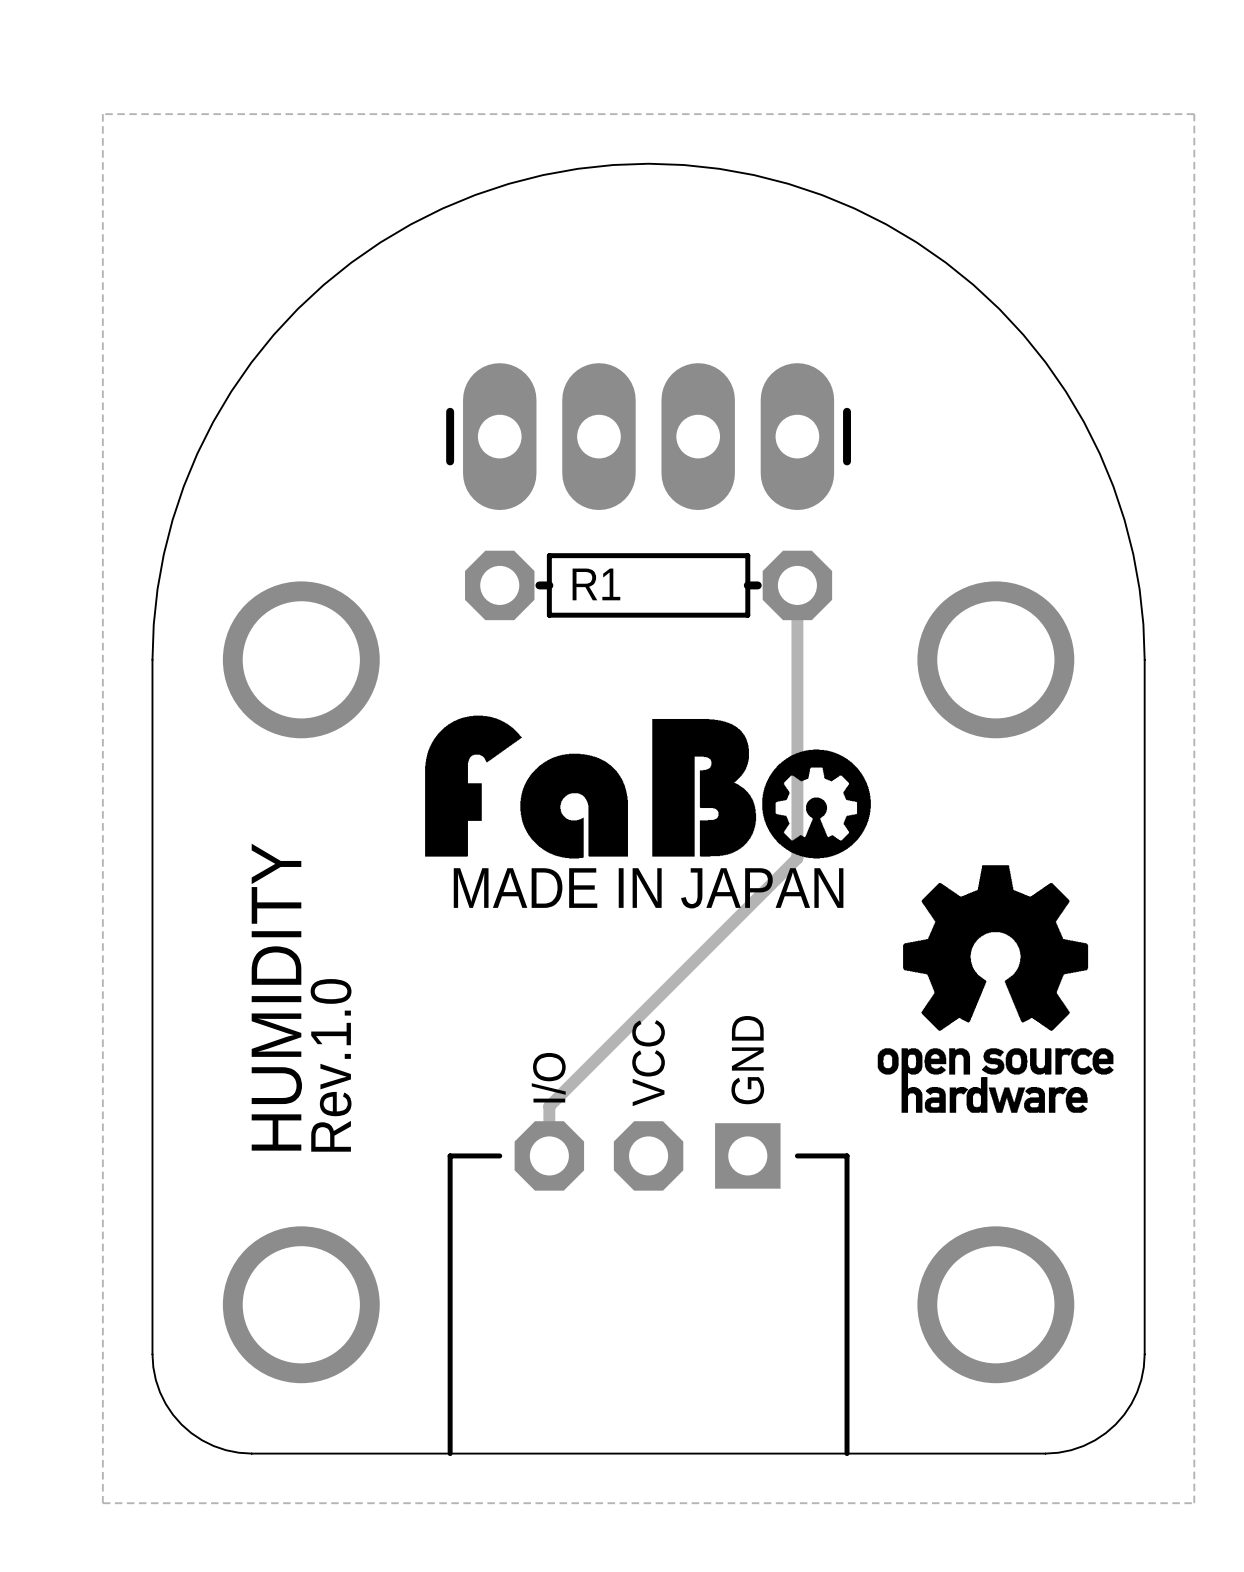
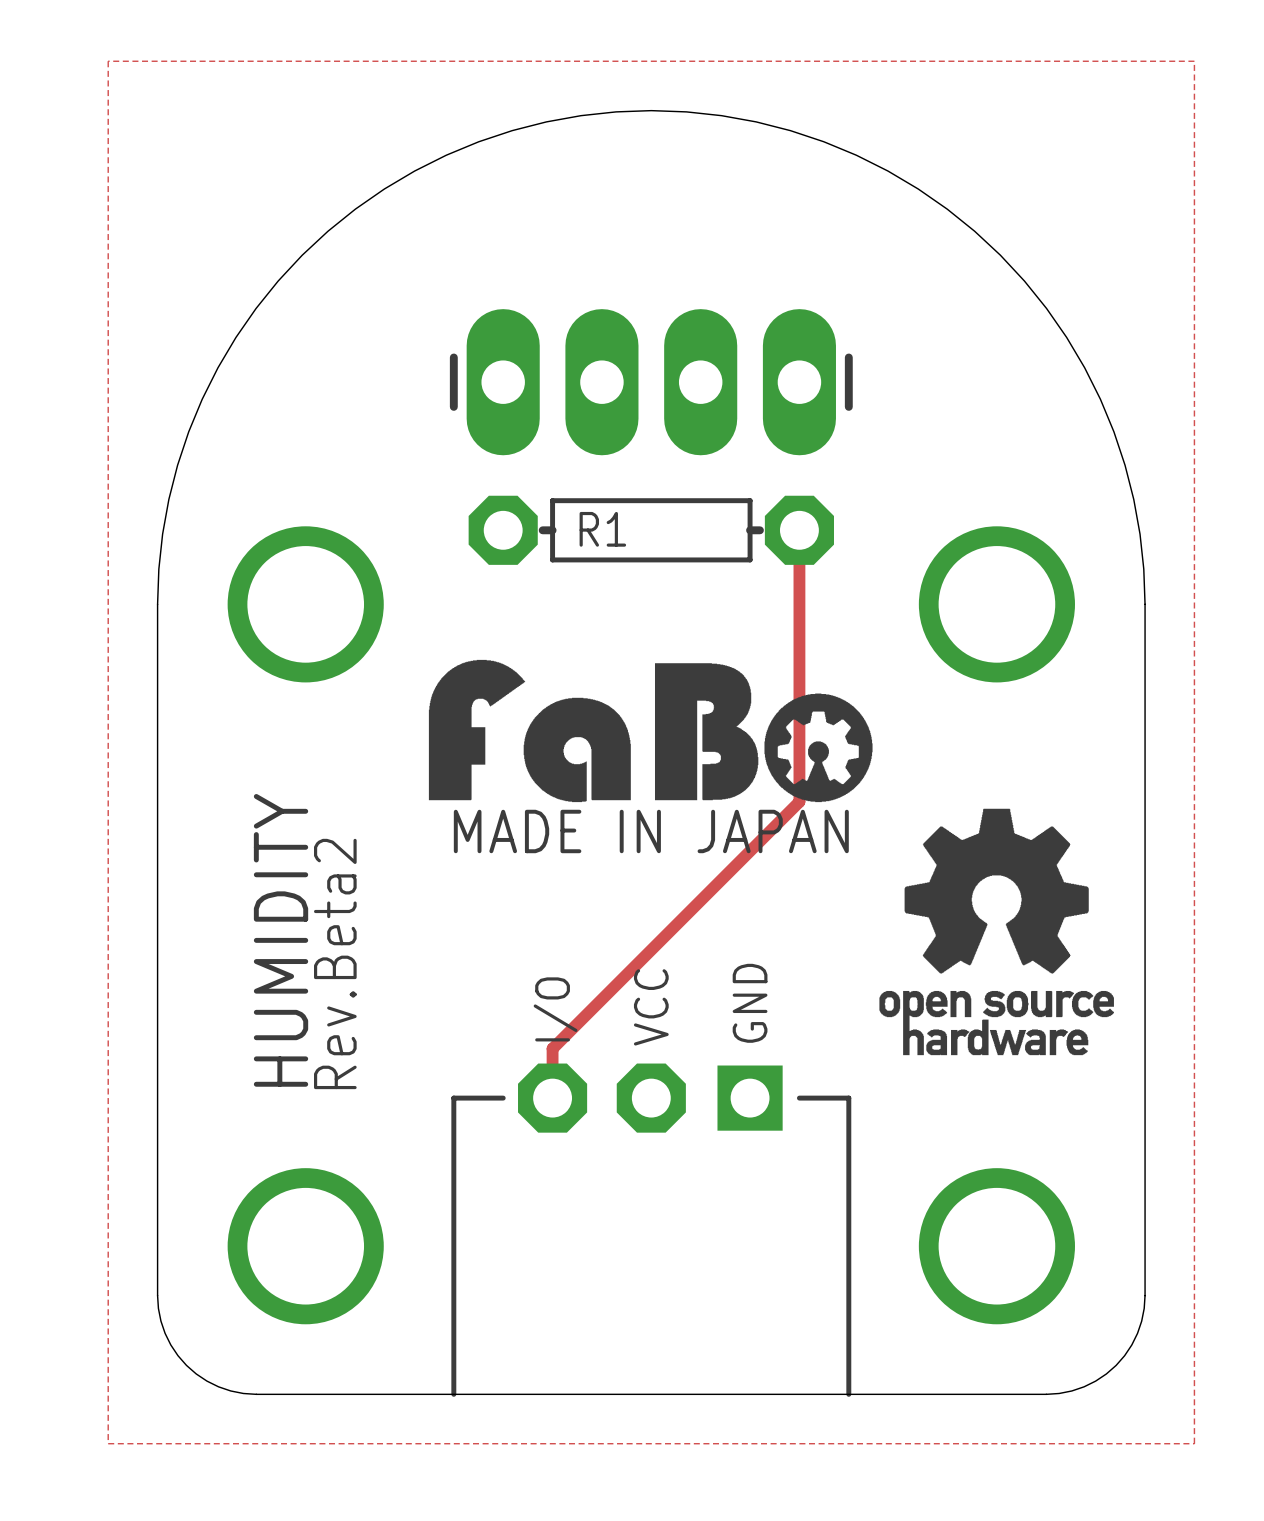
text: Rev.1.0 (331, 1065) -> Rev.Beta2 (335, 963)

